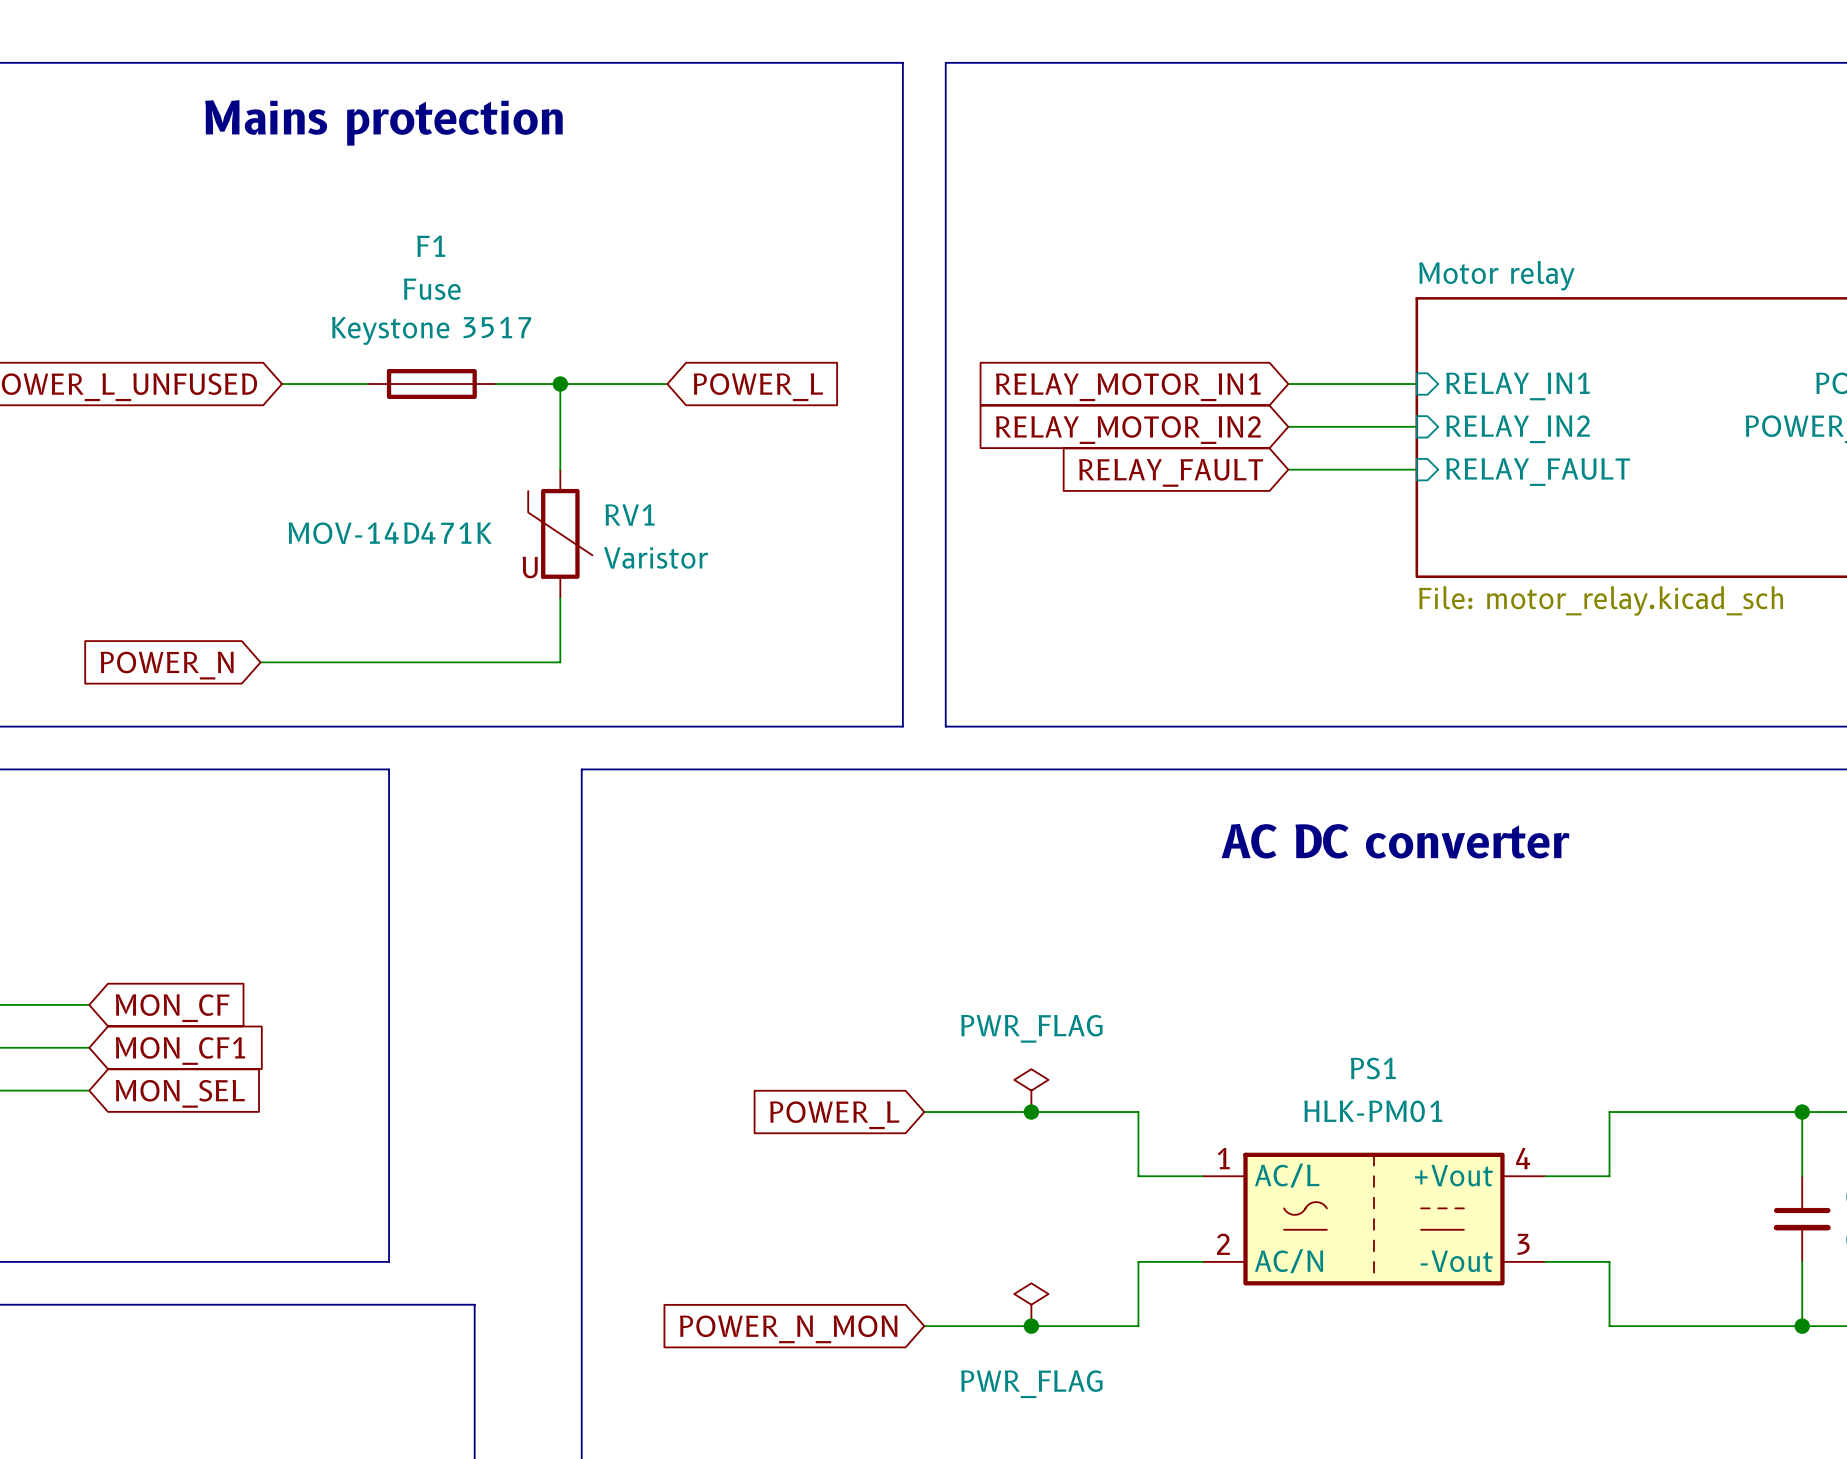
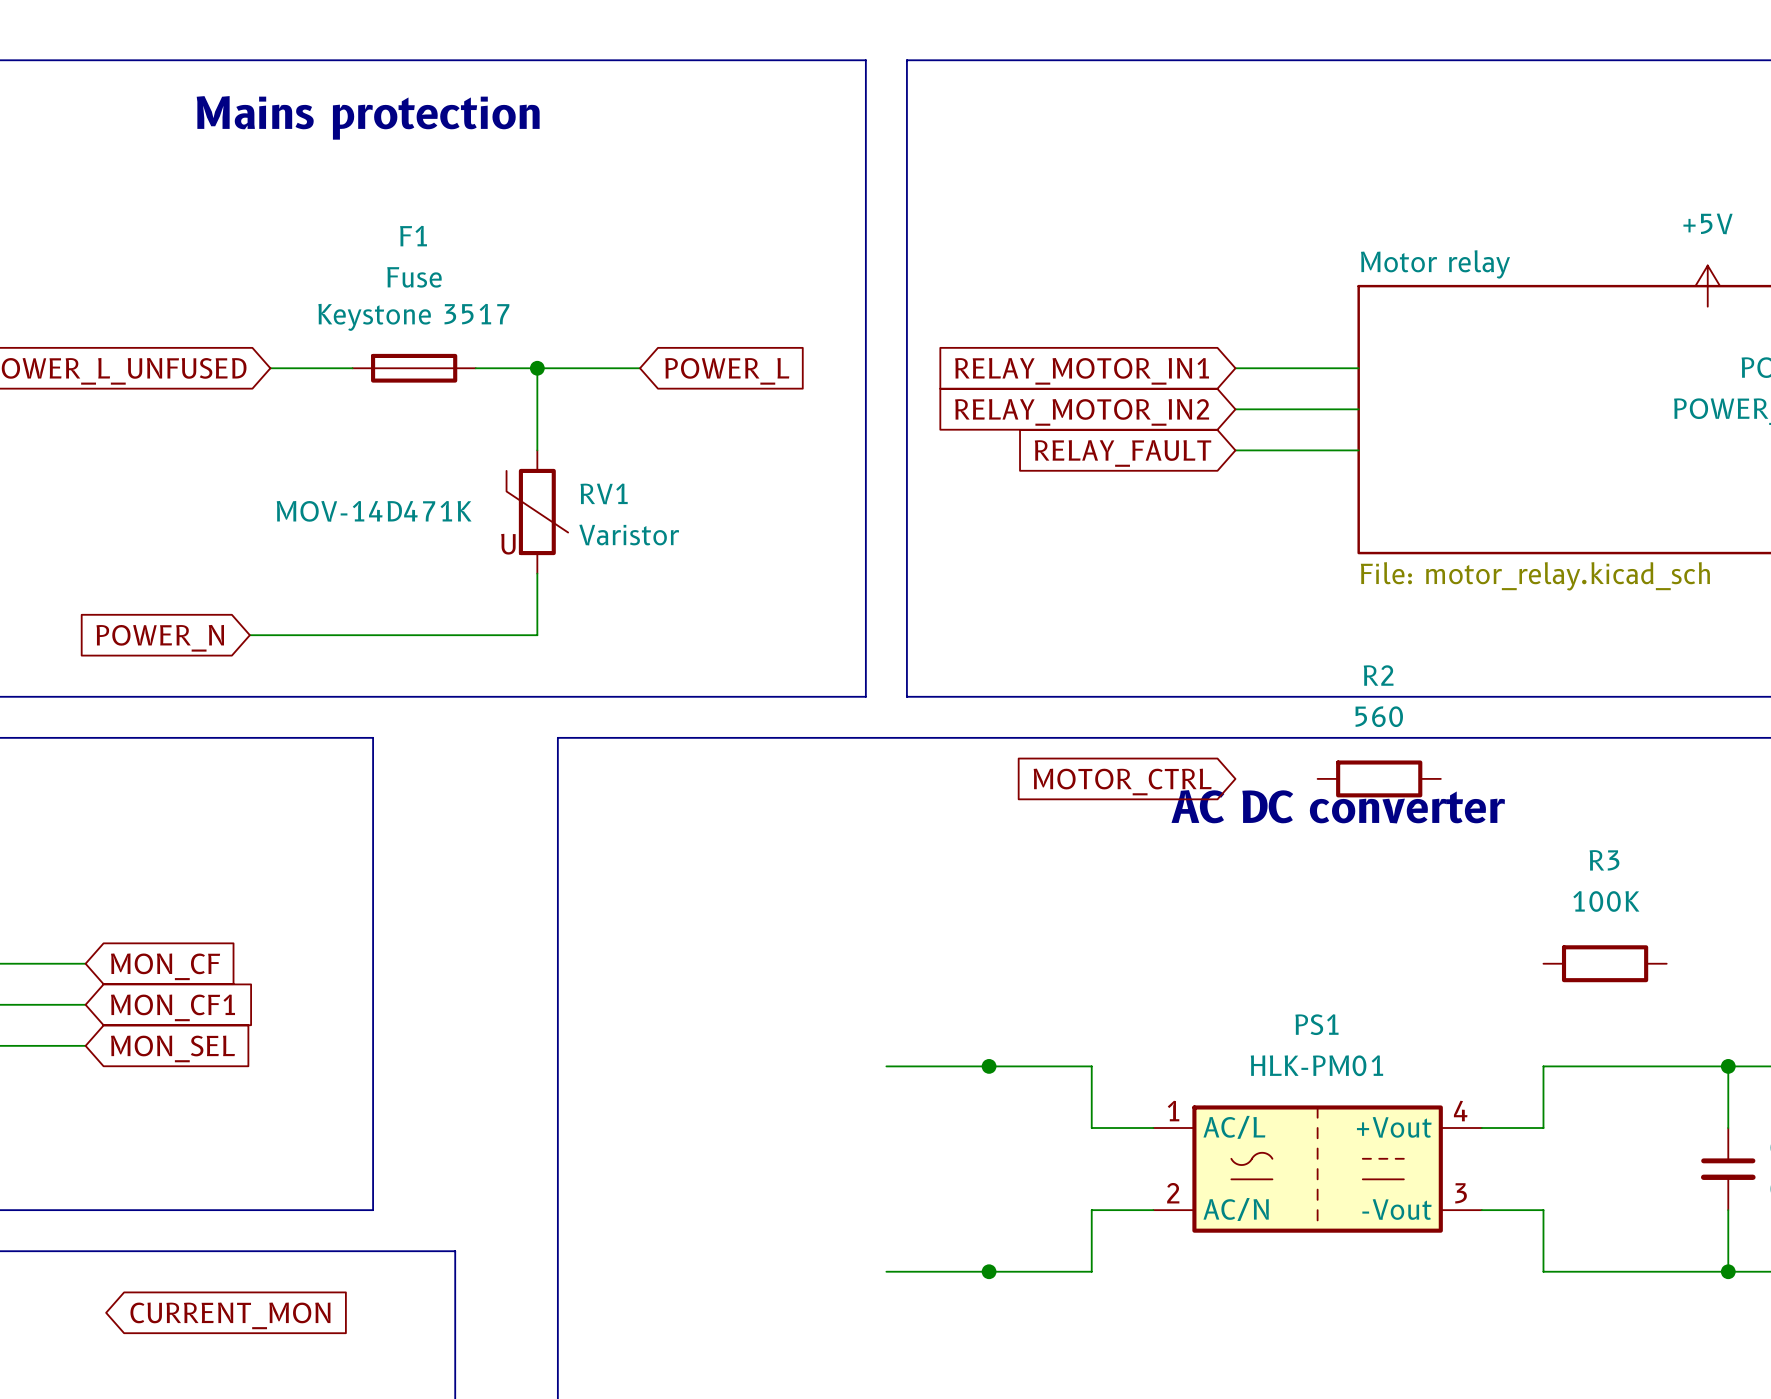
power symbol: none -> +5V (1707, 286)
sheet pin: RELAY_IN1 (1517, 386) -> none
sheet pin: RELAY_IN2 (1518, 429) -> none
sheet pin: RELAY_FAULT (1538, 472) -> none
R2: none -> 560 (1379, 778)
global label: none -> MOTOR_CTRL (1122, 782)
R3: none -> 100K (1605, 963)
power symbol: PWR_FLAG (1031, 1090) -> none
global label: POWER_L (834, 1115) -> none
power symbol: PWR_FLAG (1031, 1304) -> none
global label: POWER_N_MON (788, 1329) -> none
global label: none -> CURRENT_MON (230, 1315)

